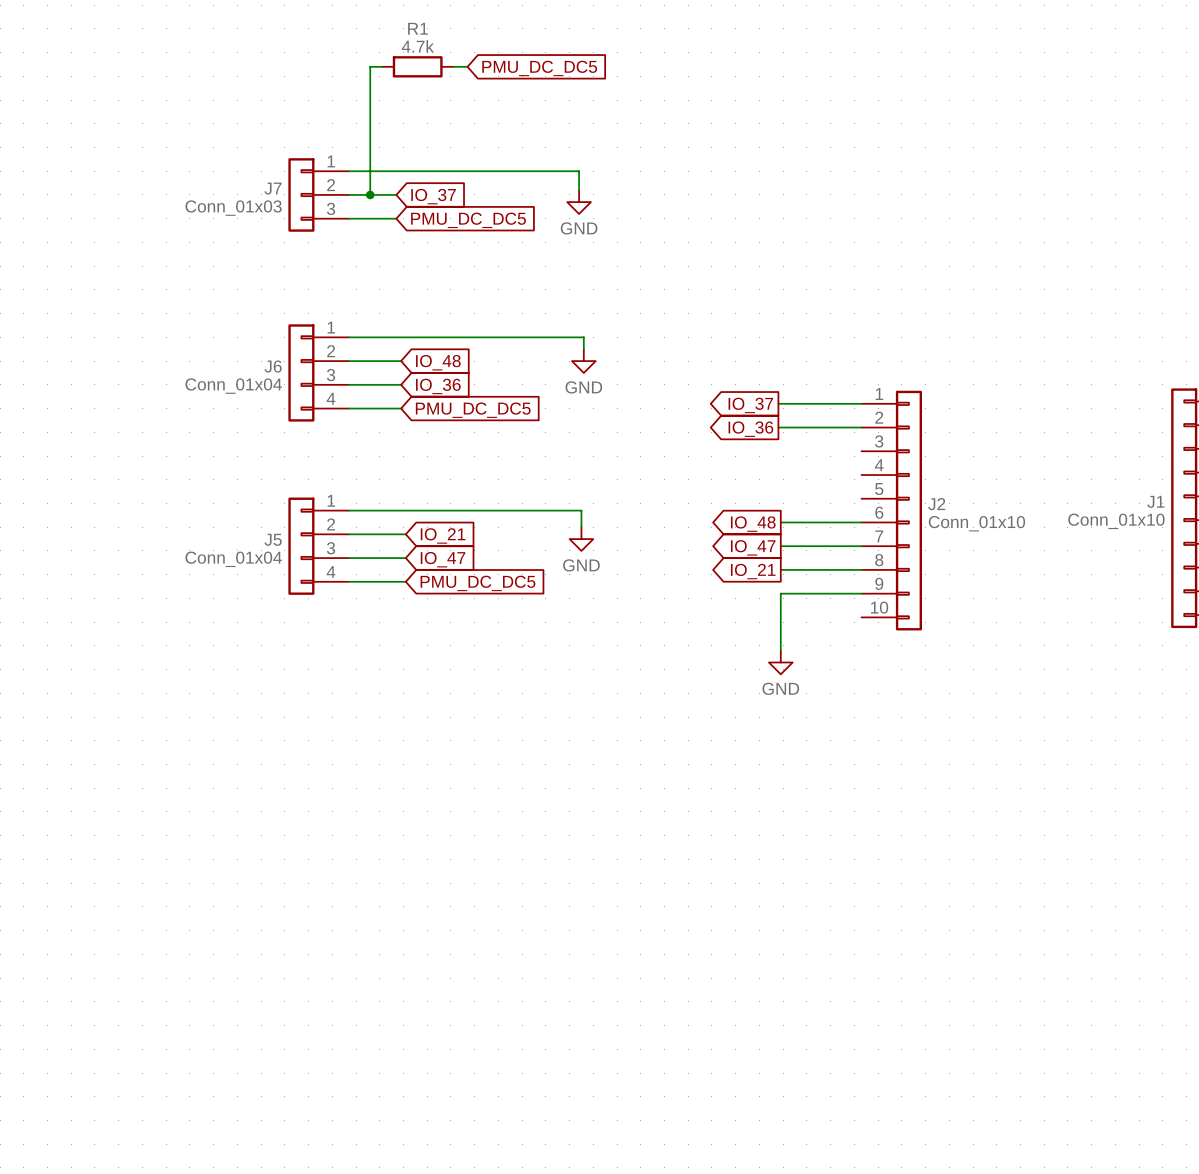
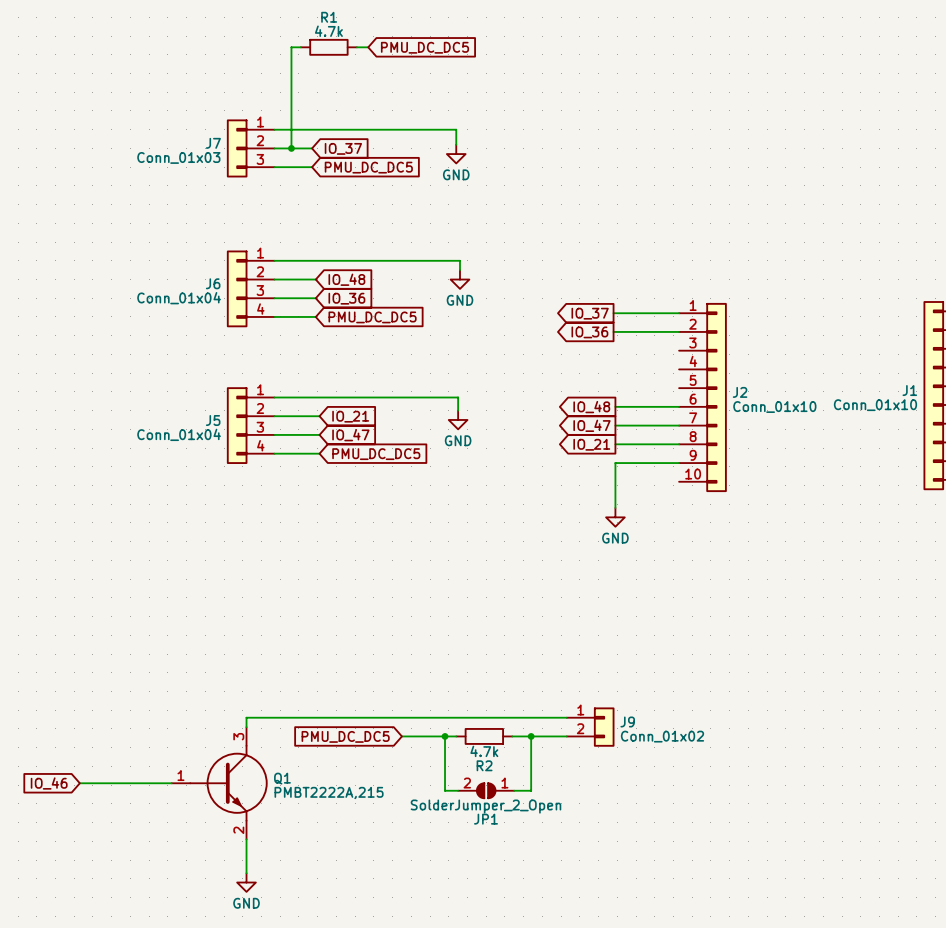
wire: none -> (566, 717) (246, 717) (246, 727)
J9: none -> Conn_01x02 (590, 727)
wire: none -> (401, 736) (456, 736)
wire: none -> (445, 736) (445, 790) (458, 790)
junction: none -> (445, 736)
R2: none -> 4.7k (484, 736)
wire: none -> (512, 736) (566, 736)
wire: none -> (531, 736) (531, 790) (514, 790)
junction: none -> (531, 736)
global label: none -> PMU_DC_DC5 (345, 736)
wire: none -> (79, 783) (171, 783)
Q1: none -> PMBT2222A,215 (219, 783)
global label: none -> IO_46 (49, 783)
JP1: none -> SolderJumper_2_Open (486, 790)
wire: none -> (246, 839) (246, 873)
power symbol: none -> GND (246, 882)

